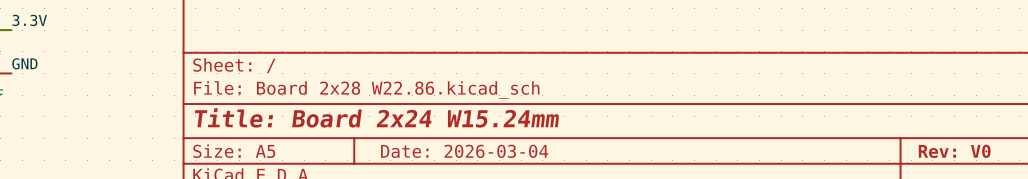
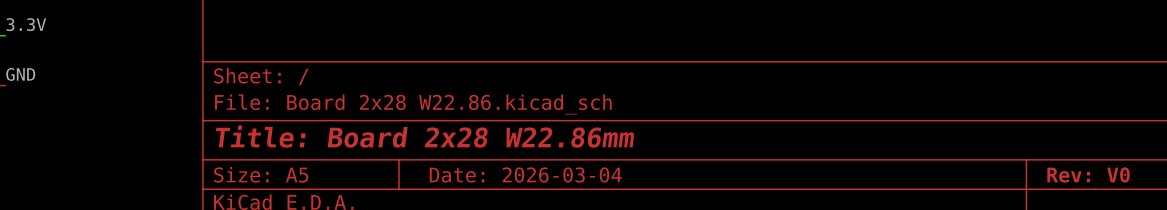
title block: Title: Board 2x24 W15.24mm (376, 117) -> Title: Board 2x28 W22.86mm (425, 136)

